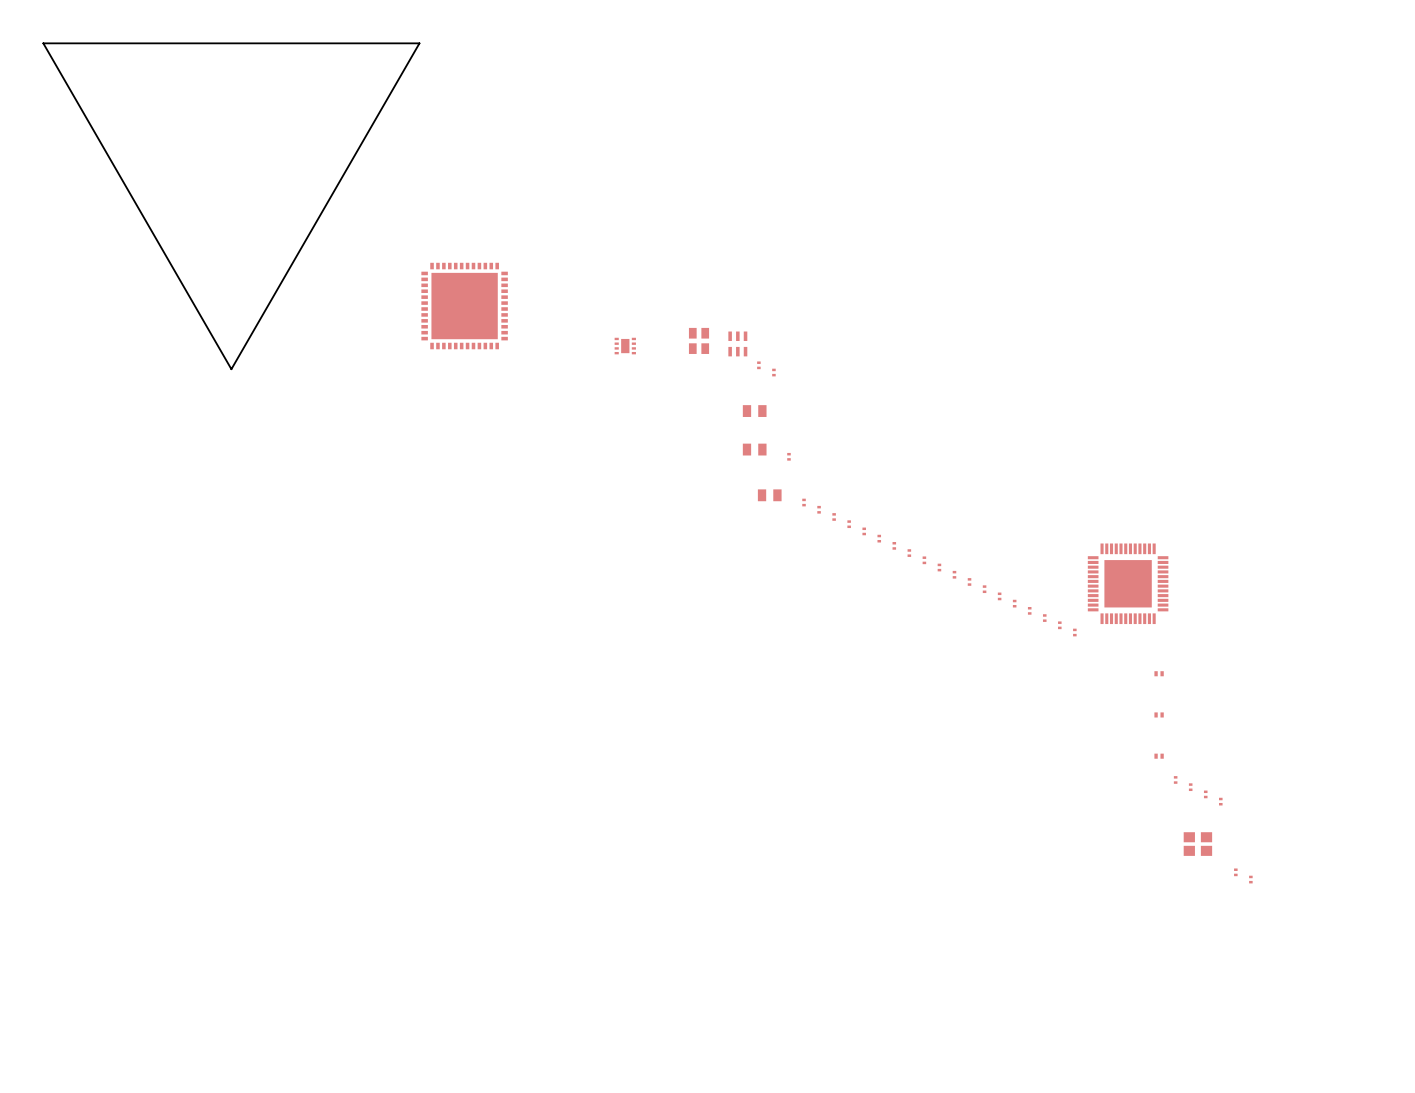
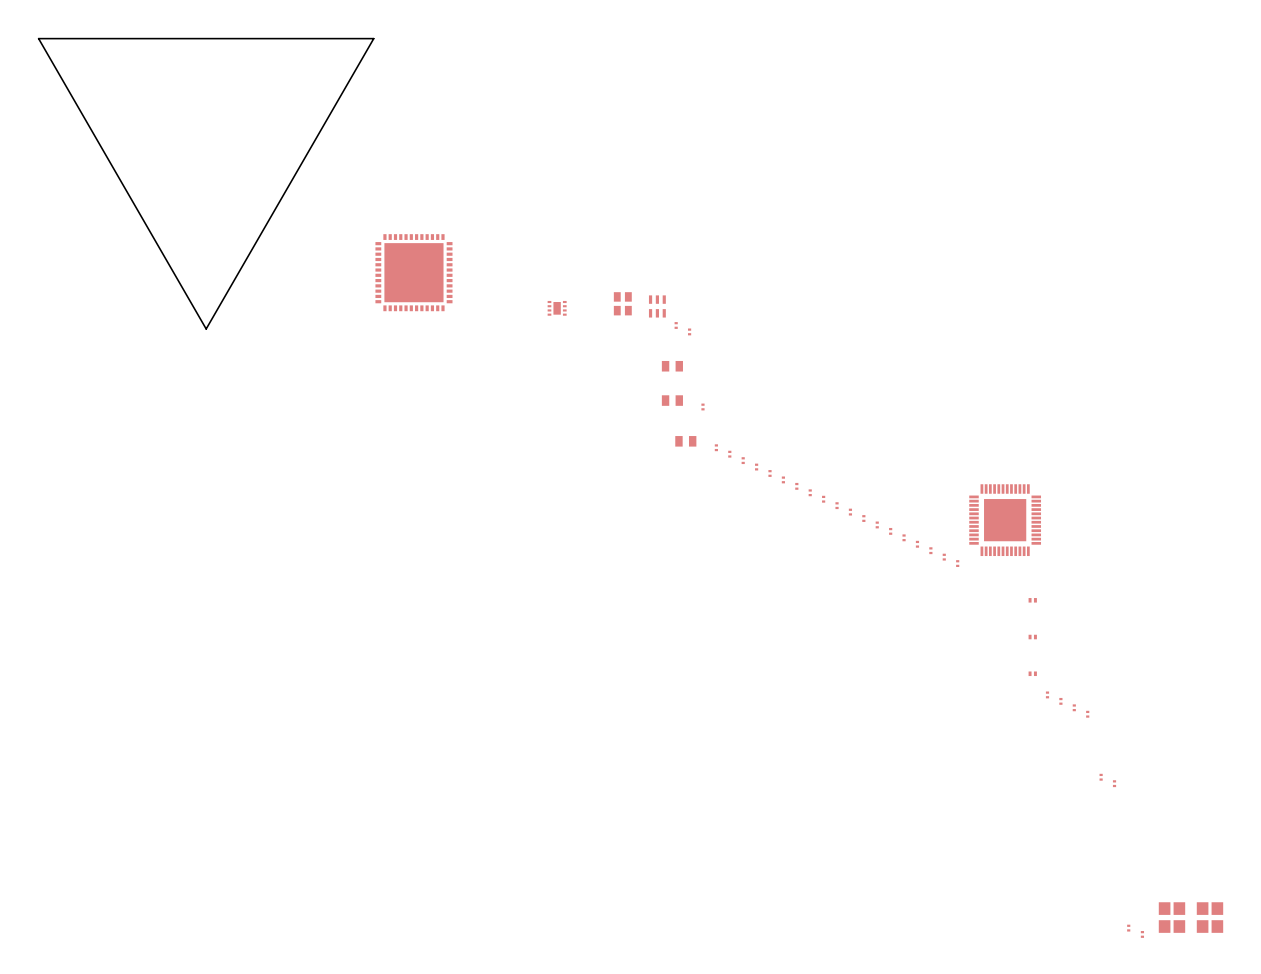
part: (1197, 844) -> none
part: none -> (1171, 917)
part: none -> (1209, 917)
part: none -> (1128, 928)
part: none -> (1142, 934)

